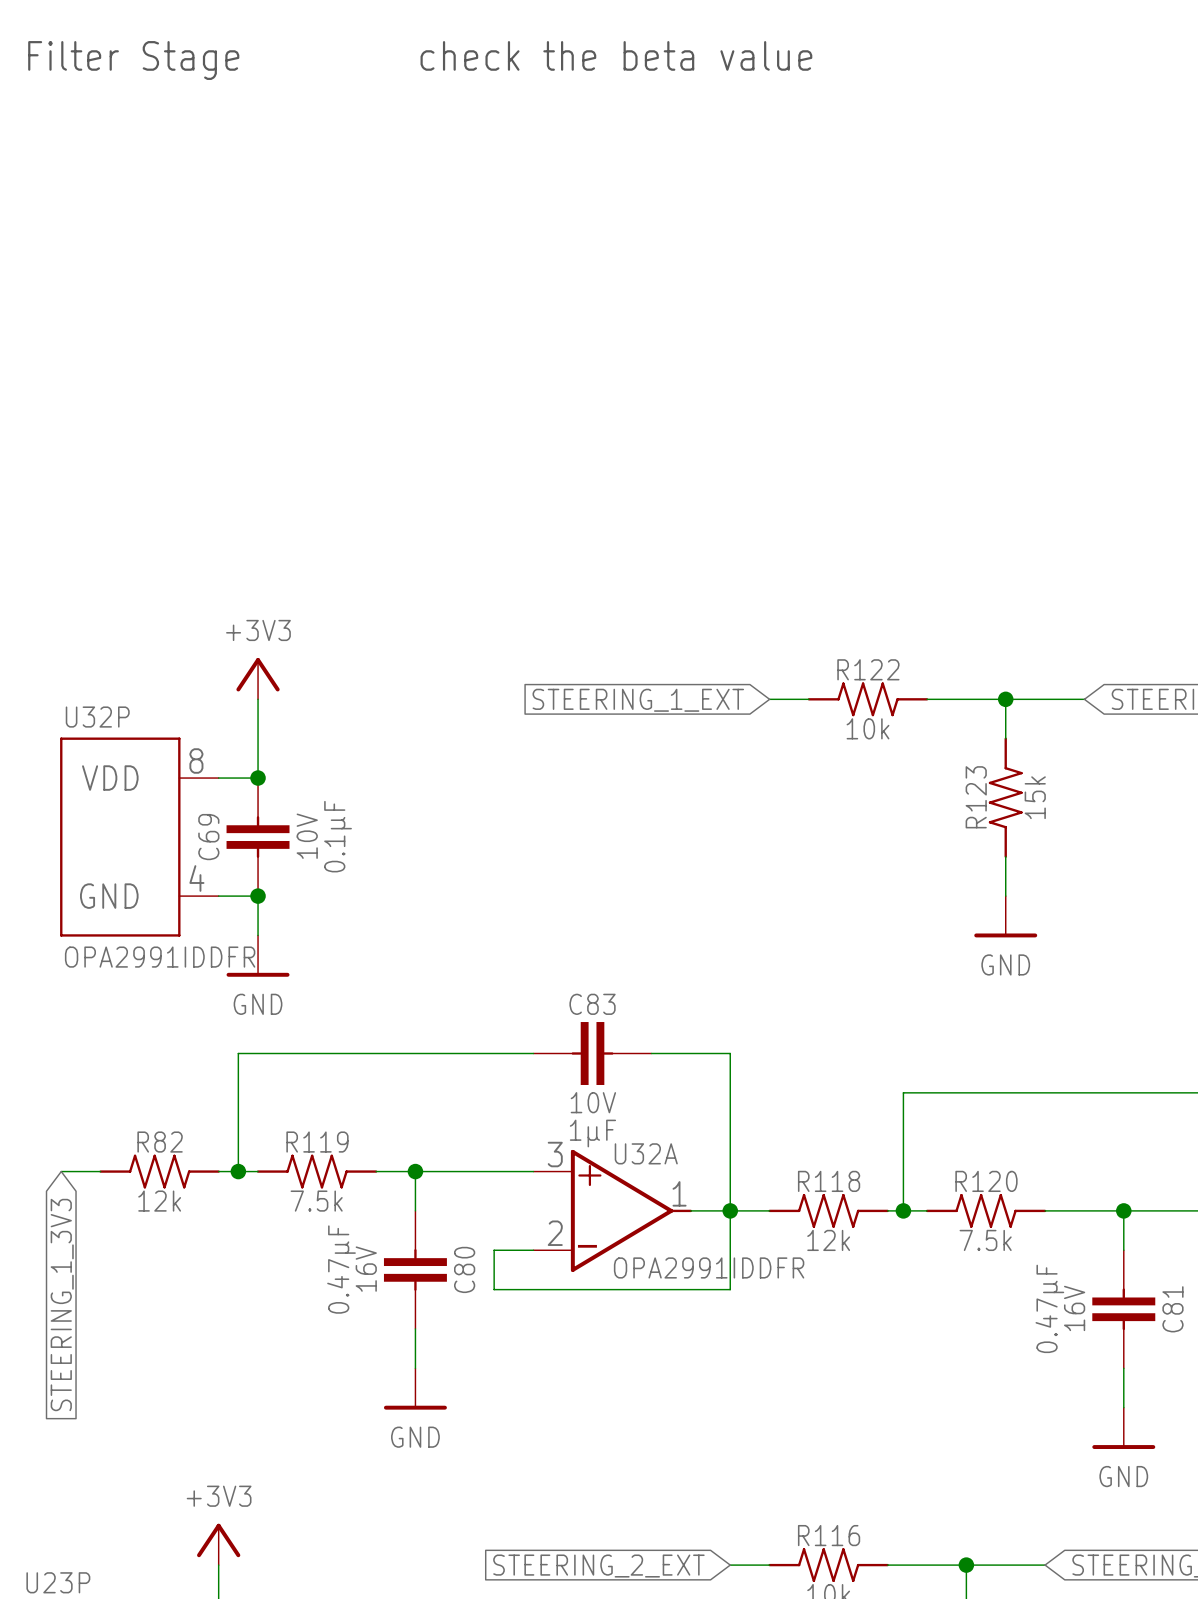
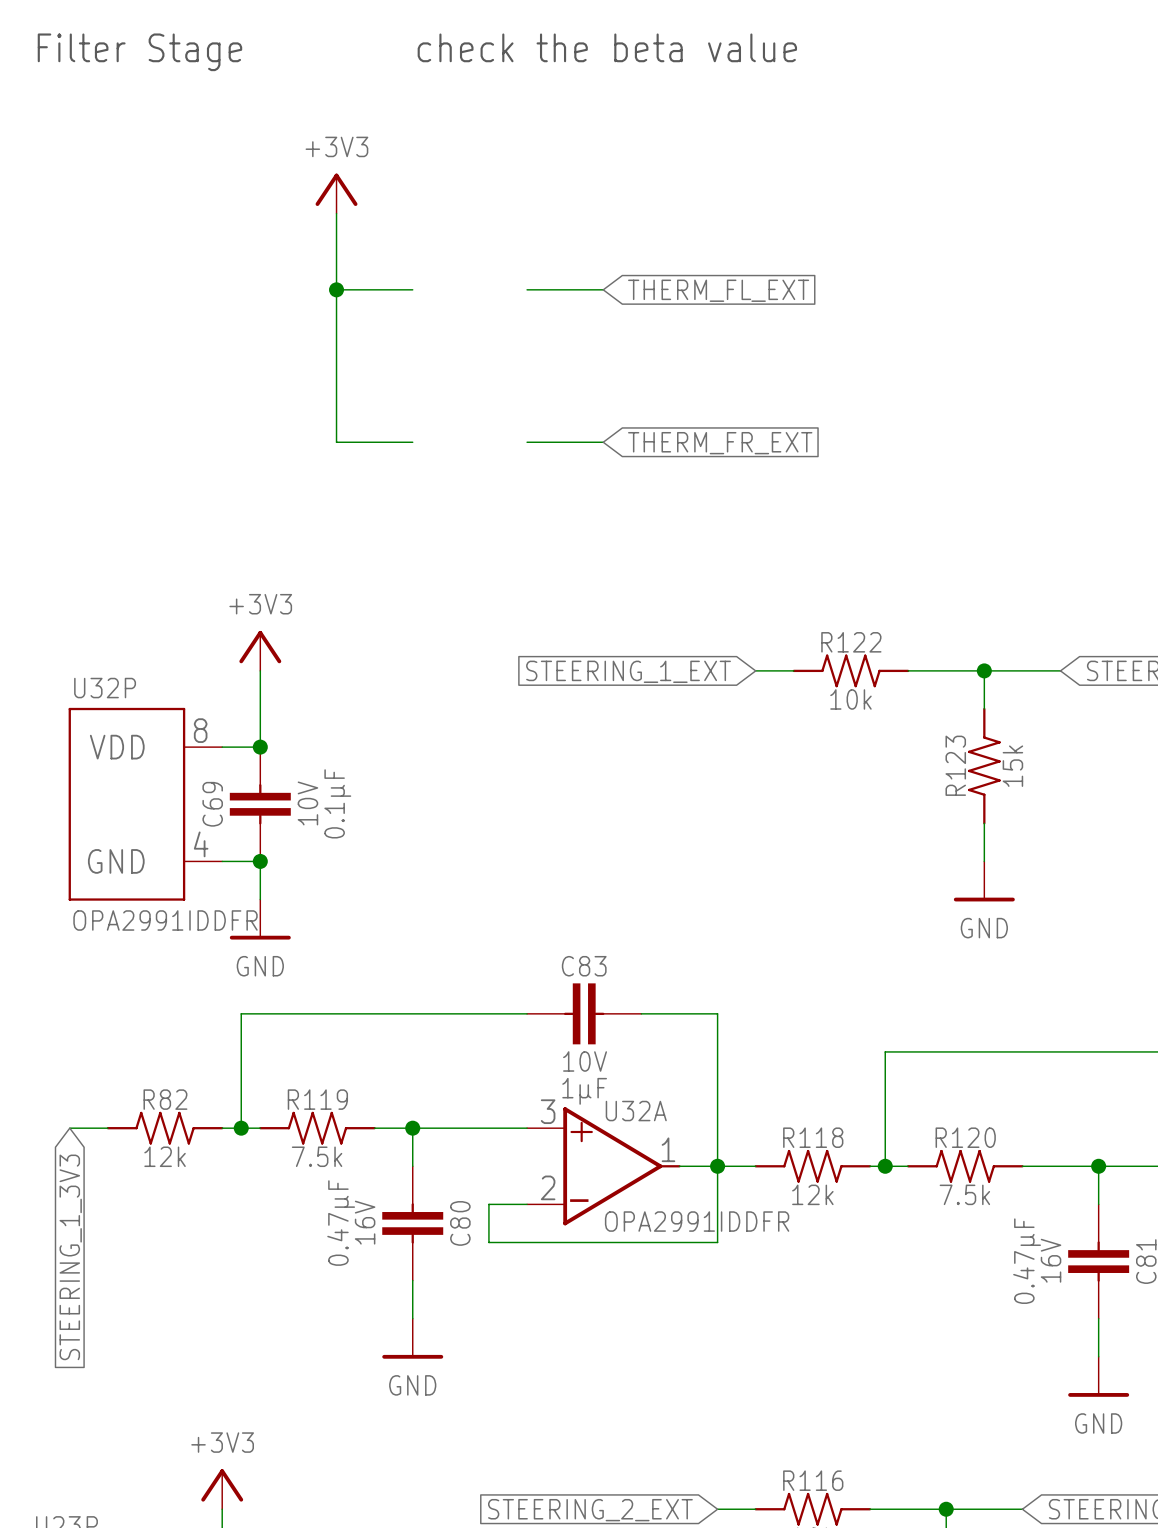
power symbol: none -> +3V3 (336, 193)
wire: none -> (336, 213) (336, 442) (412, 442)
wire: none -> (336, 289) (412, 289)
junction: none -> (336, 289)
wire: none -> (527, 289) (603, 289)
global label: none -> THERM_FL_EXT (718, 290)
wire: none -> (527, 442) (603, 442)
global label: none -> THERM_FR_EXT (720, 443)

